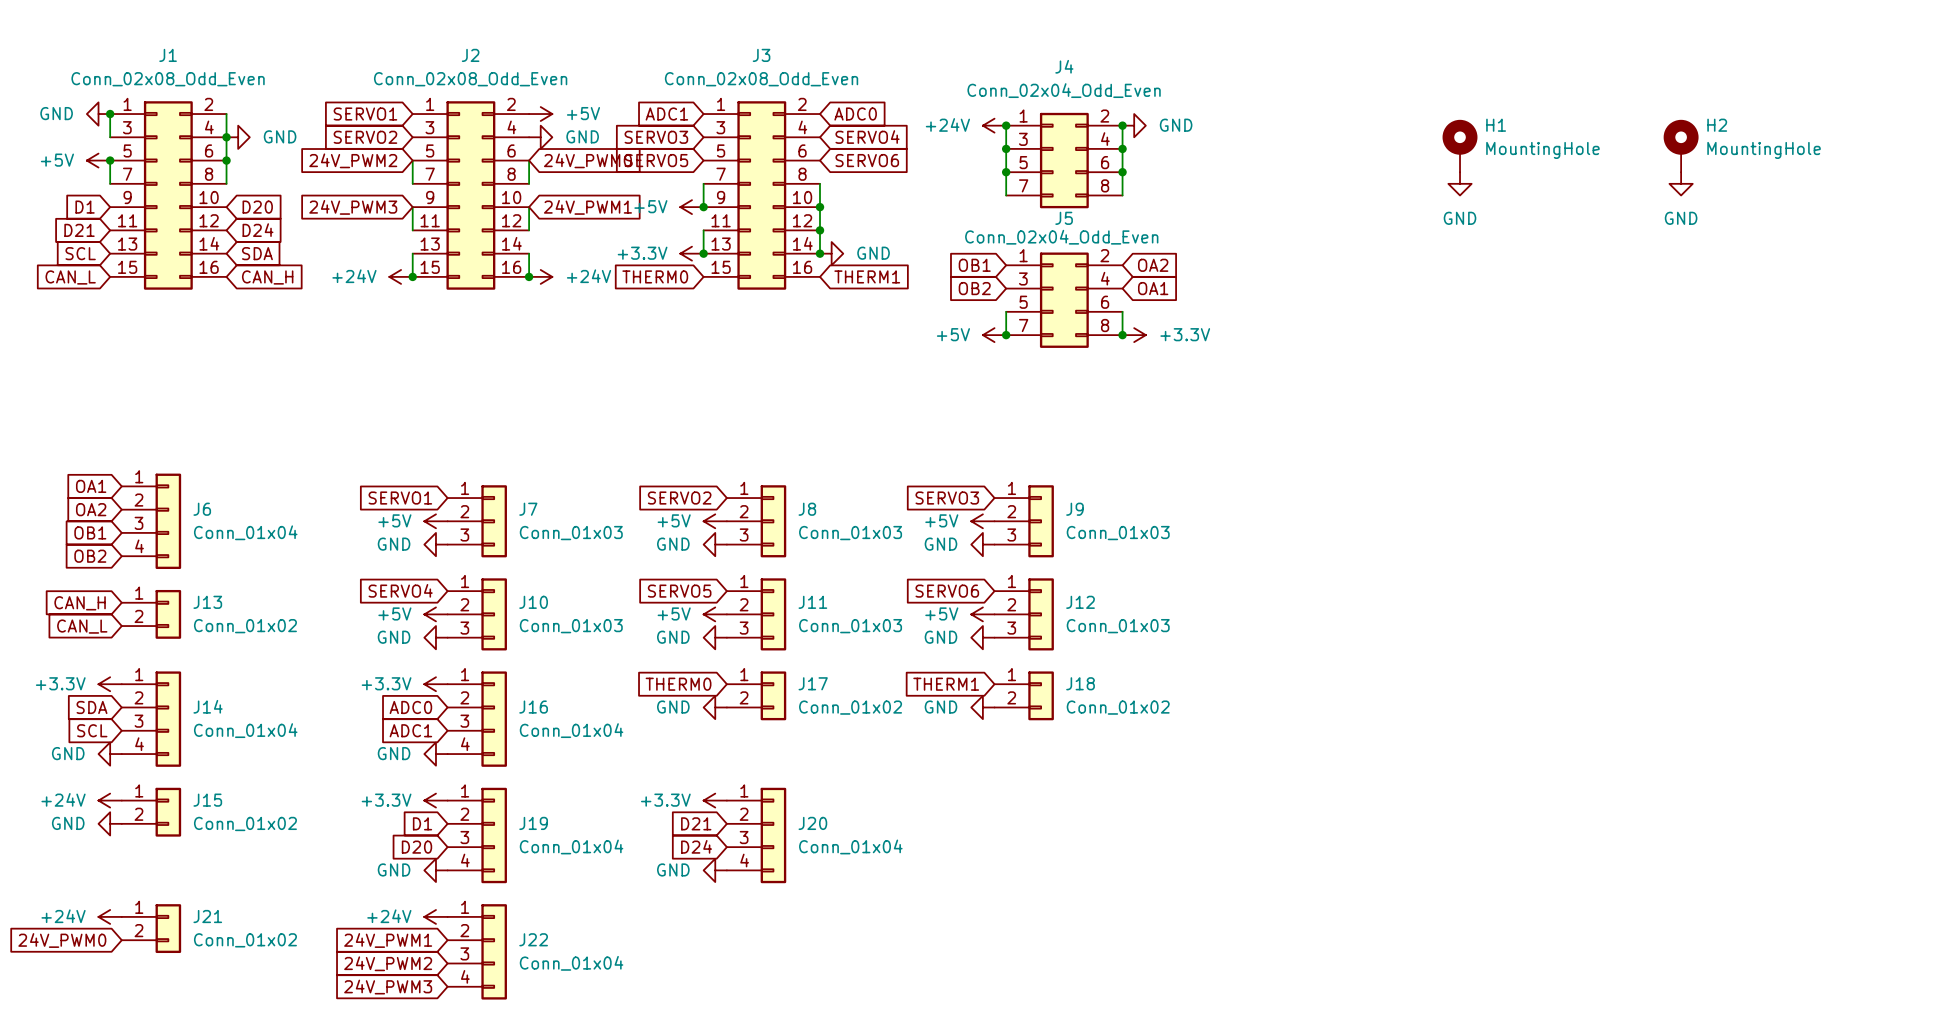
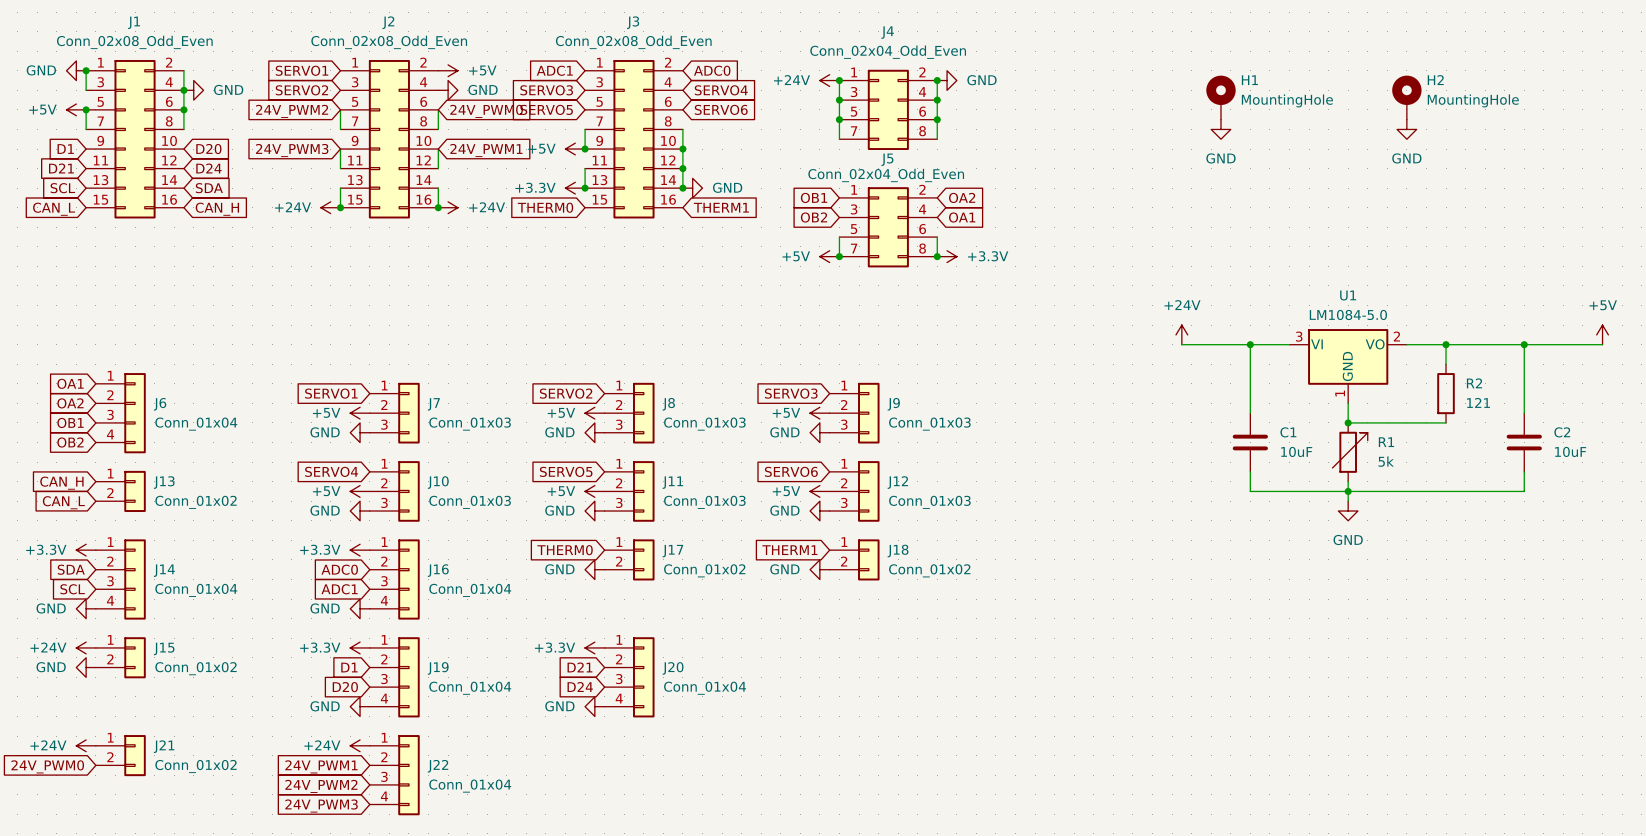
power symbol: none -> +24V (1181, 334)
power symbol: none -> +5V (1602, 334)
wire: none -> (1181, 344) (1289, 344)
wire: none -> (1250, 344) (1250, 413)
junction: none -> (1250, 344)
wire: none -> (1406, 344) (1602, 344)
wire: none -> (1446, 344) (1446, 364)
junction: none -> (1446, 344)
wire: none -> (1524, 344) (1524, 413)
junction: none -> (1524, 344)
U1: none -> LM1084-5.0 (1348, 366)
R2: none -> 121 (1446, 393)
wire: none -> (1348, 403) (1348, 422) (1446, 422)
junction: none -> (1348, 422)
C1: none -> 10uF (1250, 442)
C2: none -> 10uF (1524, 442)
R1: none -> 5k (1350, 452)
wire: none -> (1250, 471) (1250, 491) (1524, 491) (1524, 471)
wire: none -> (1348, 481) (1348, 501)
junction: none -> (1348, 491)
power symbol: none -> GND (1348, 511)

